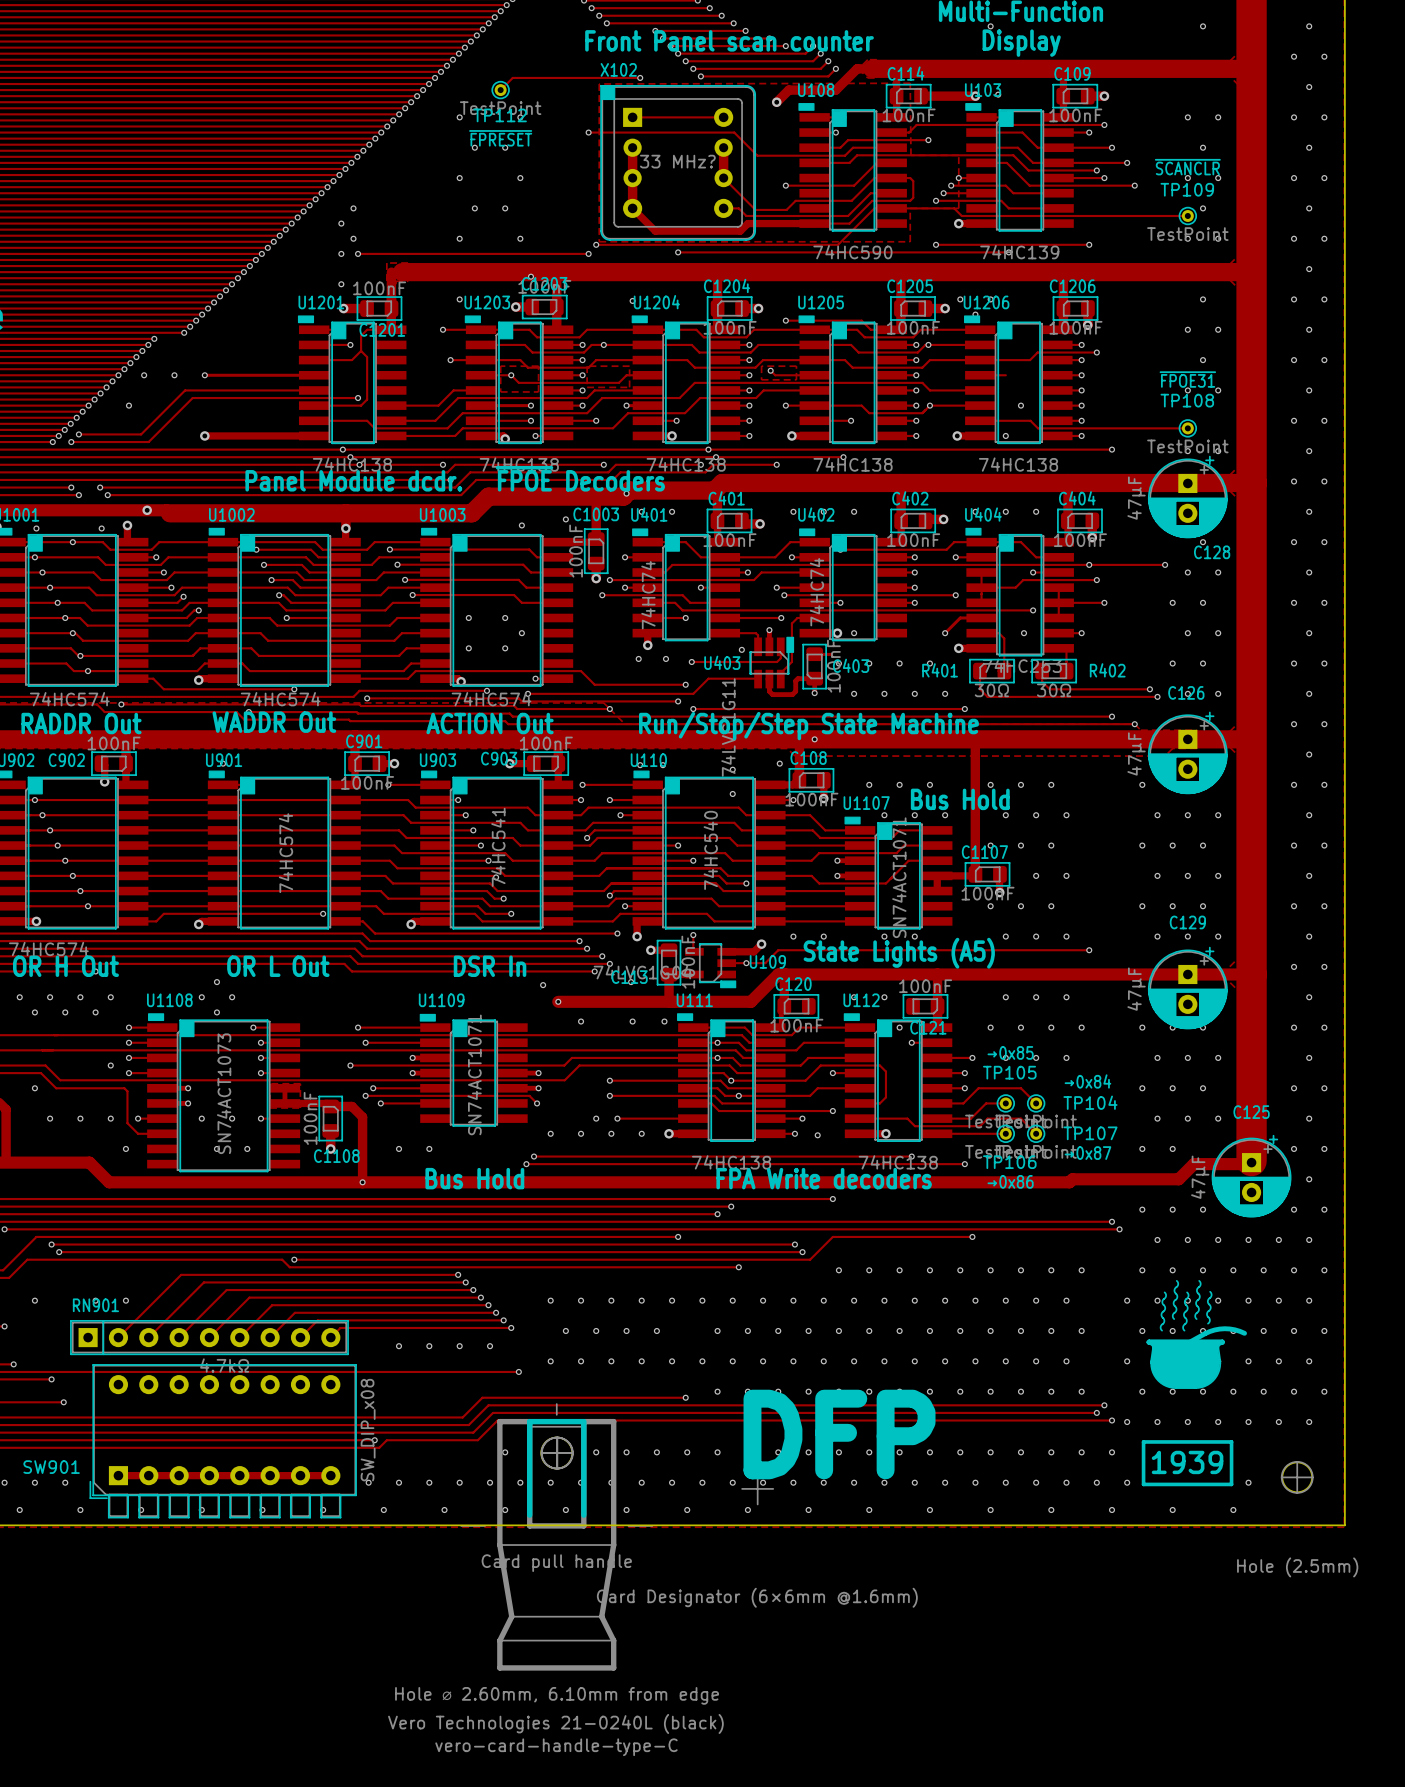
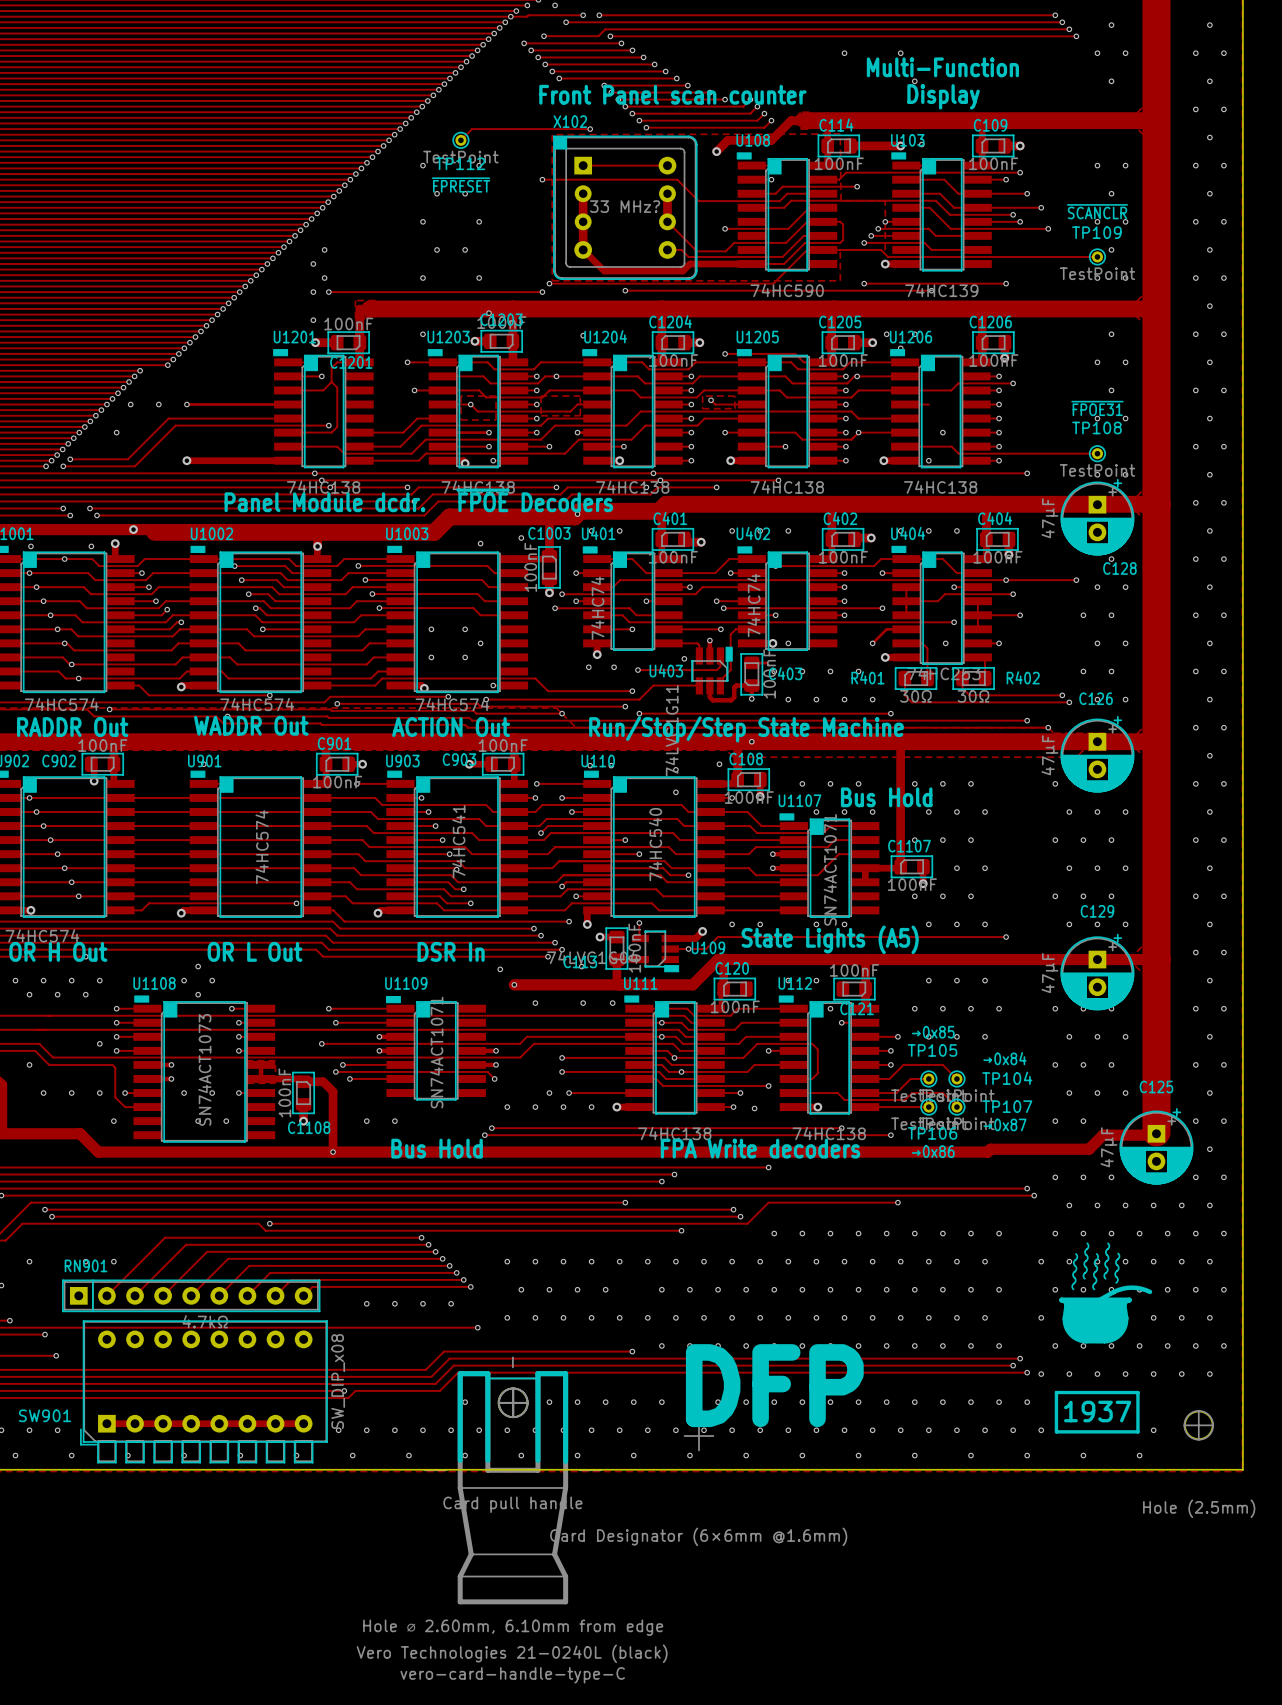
part footprint: [460, 1403, 654, 1671] -> [423, 1356, 603, 1605]
text: 1939 (1187, 1462) -> 1937 (1097, 1411)

